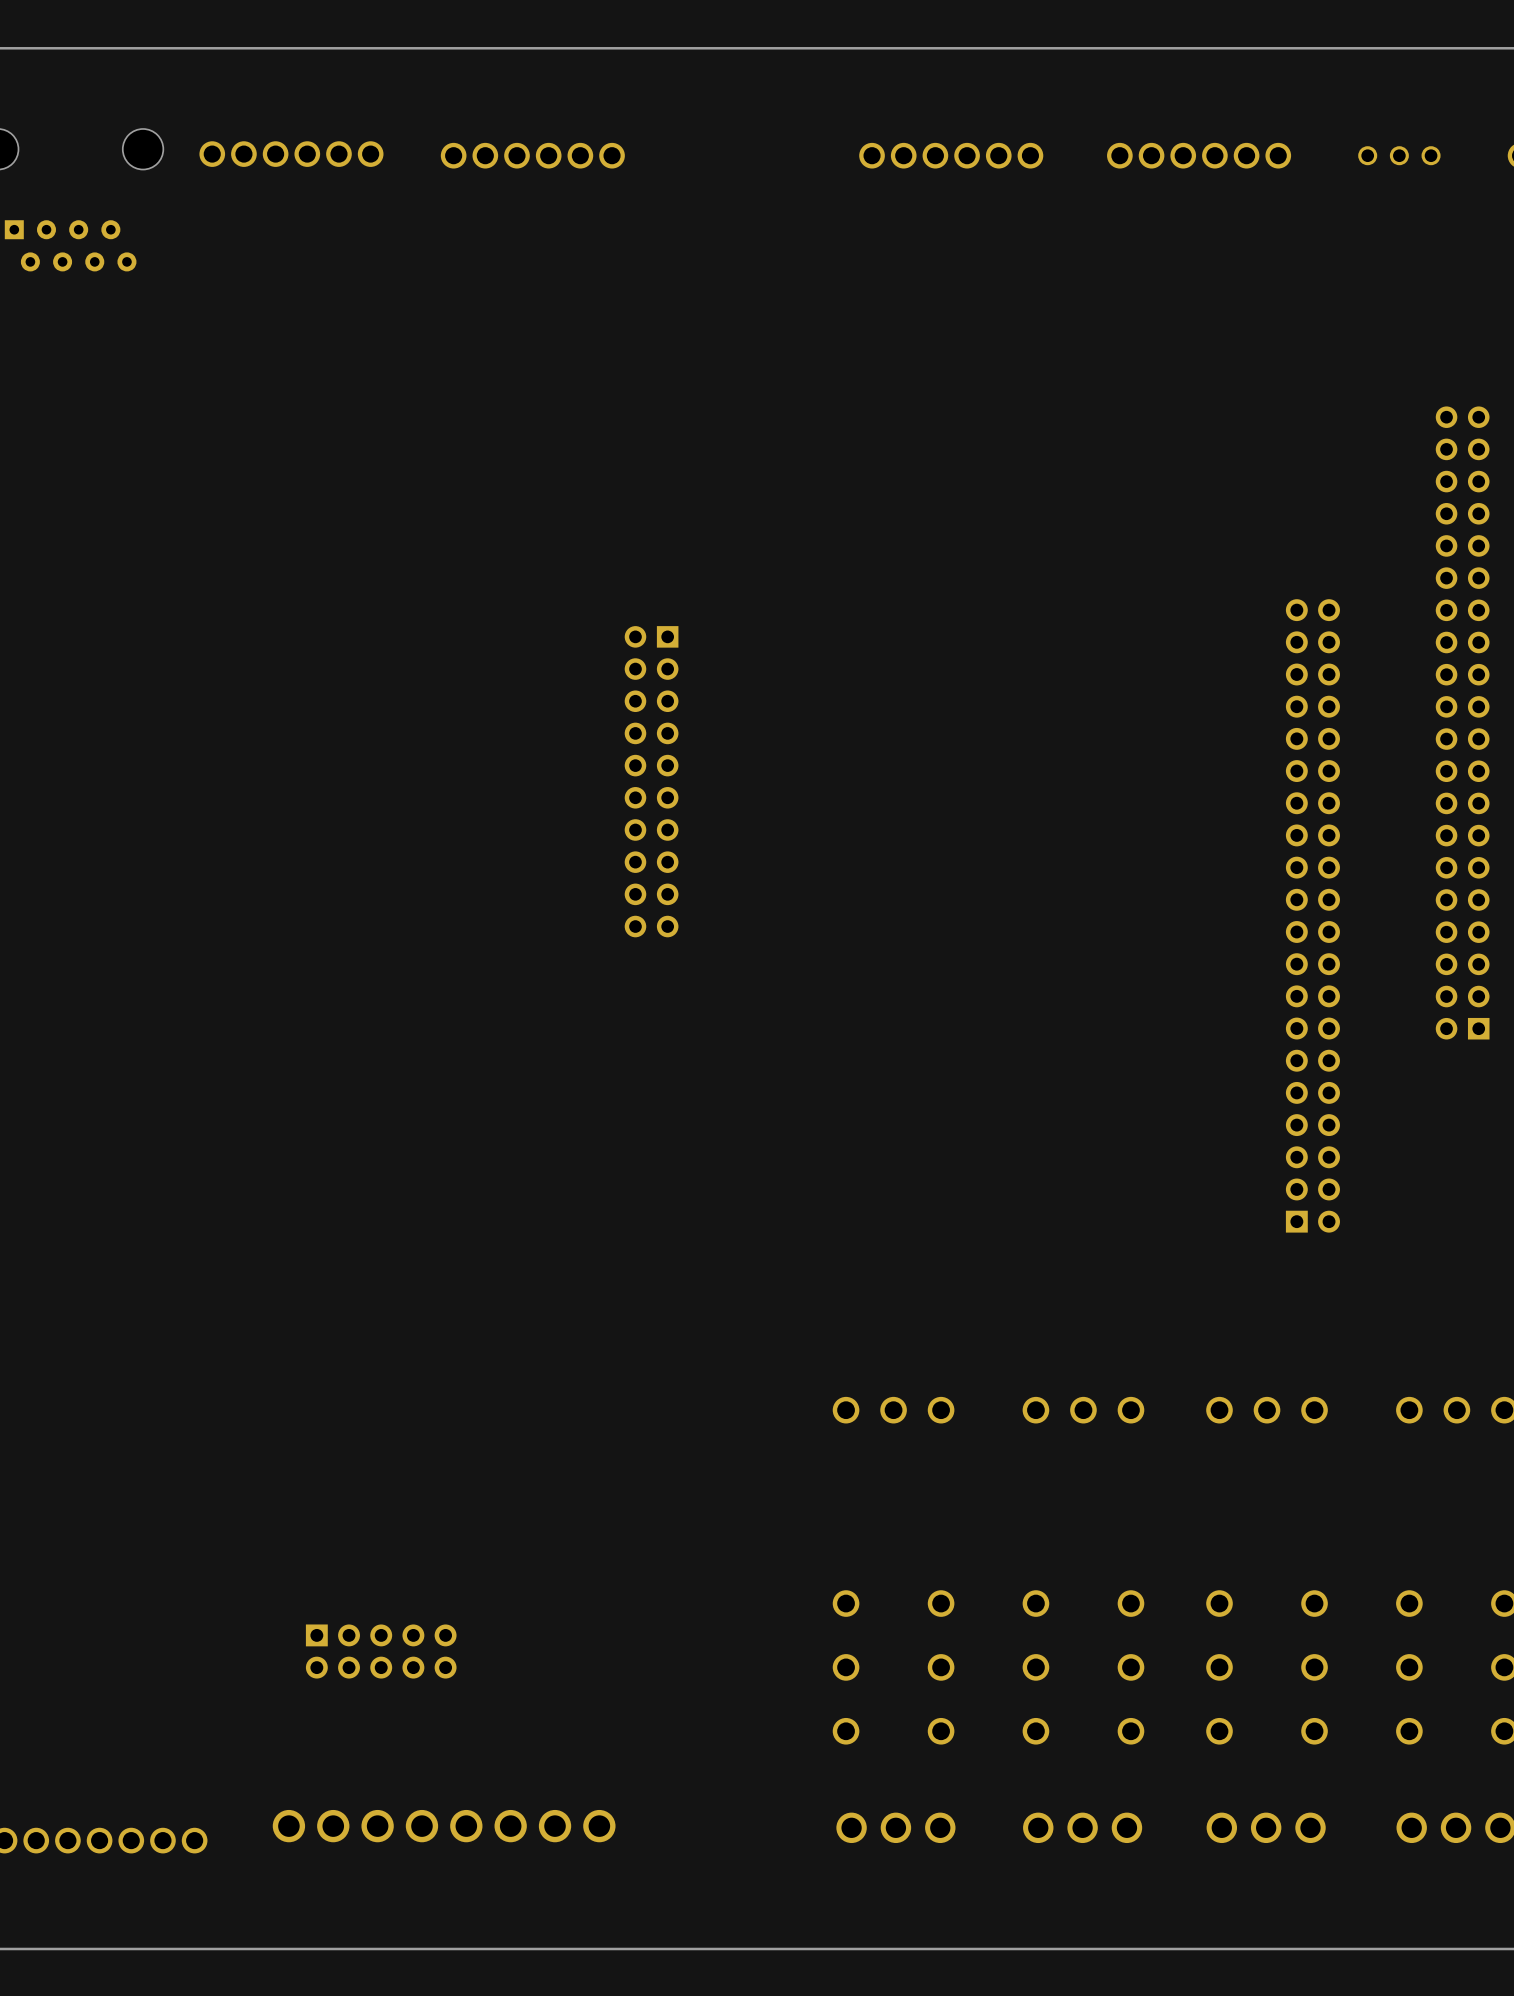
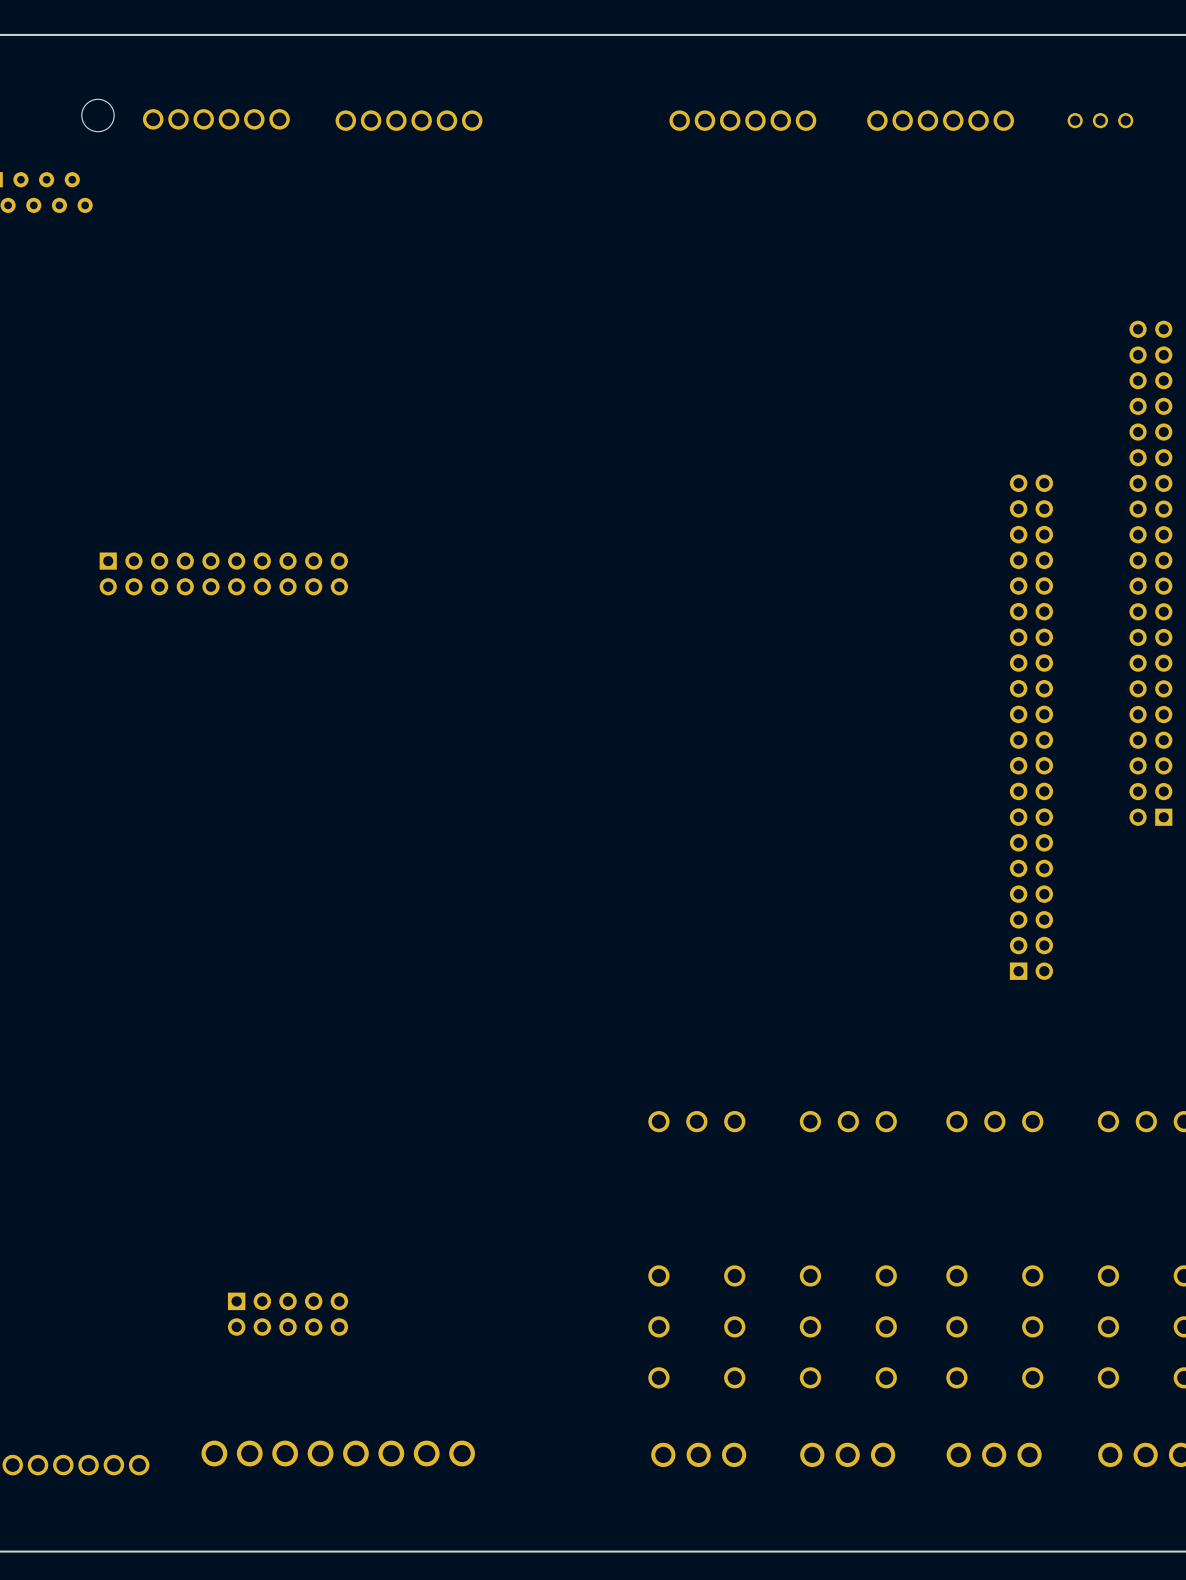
part: none -> (223, 573)
part: (651, 781) -> none

